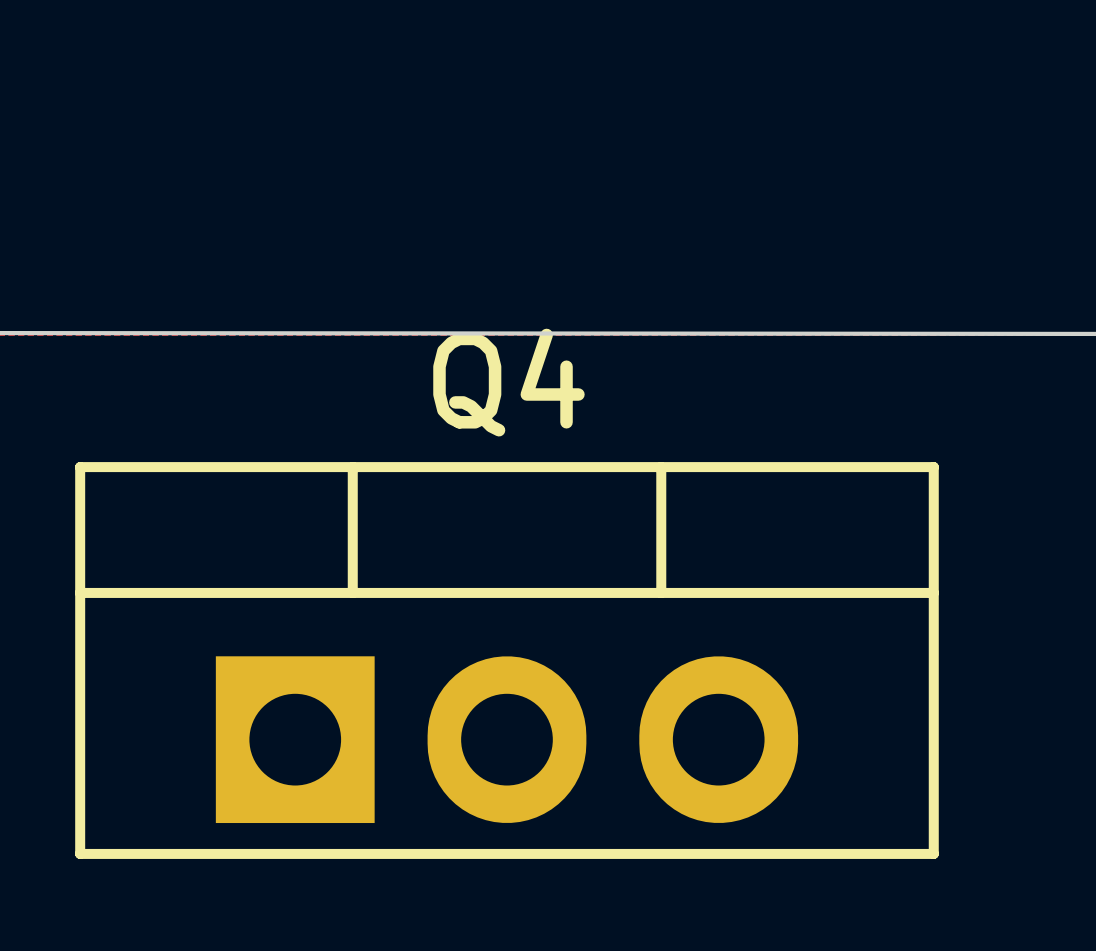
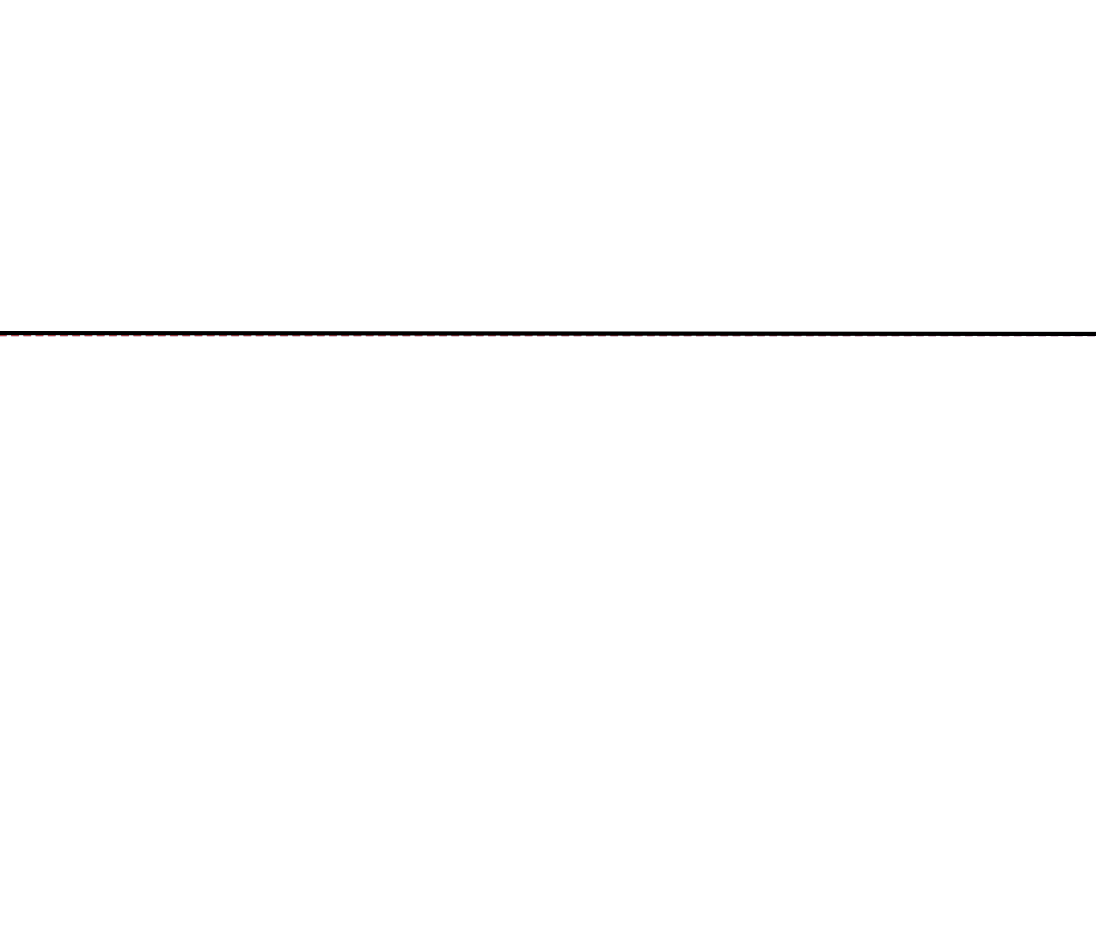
Q4: (506, 660) -> none

